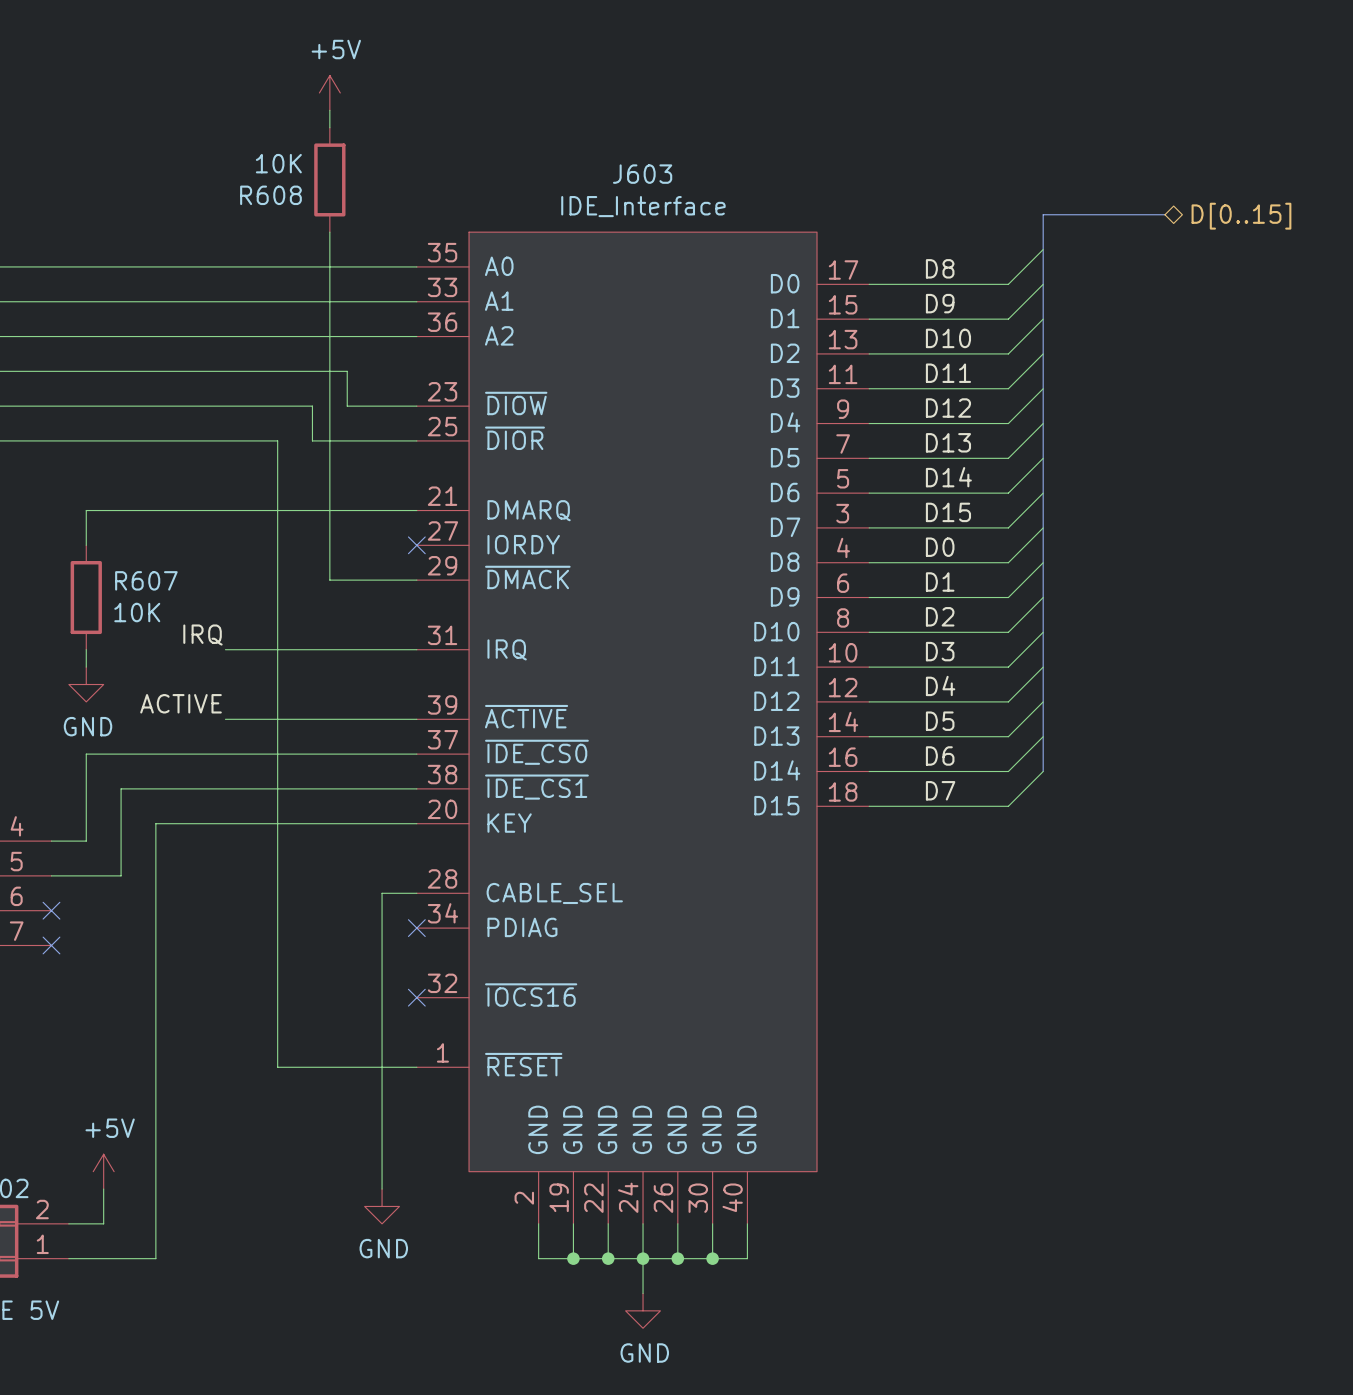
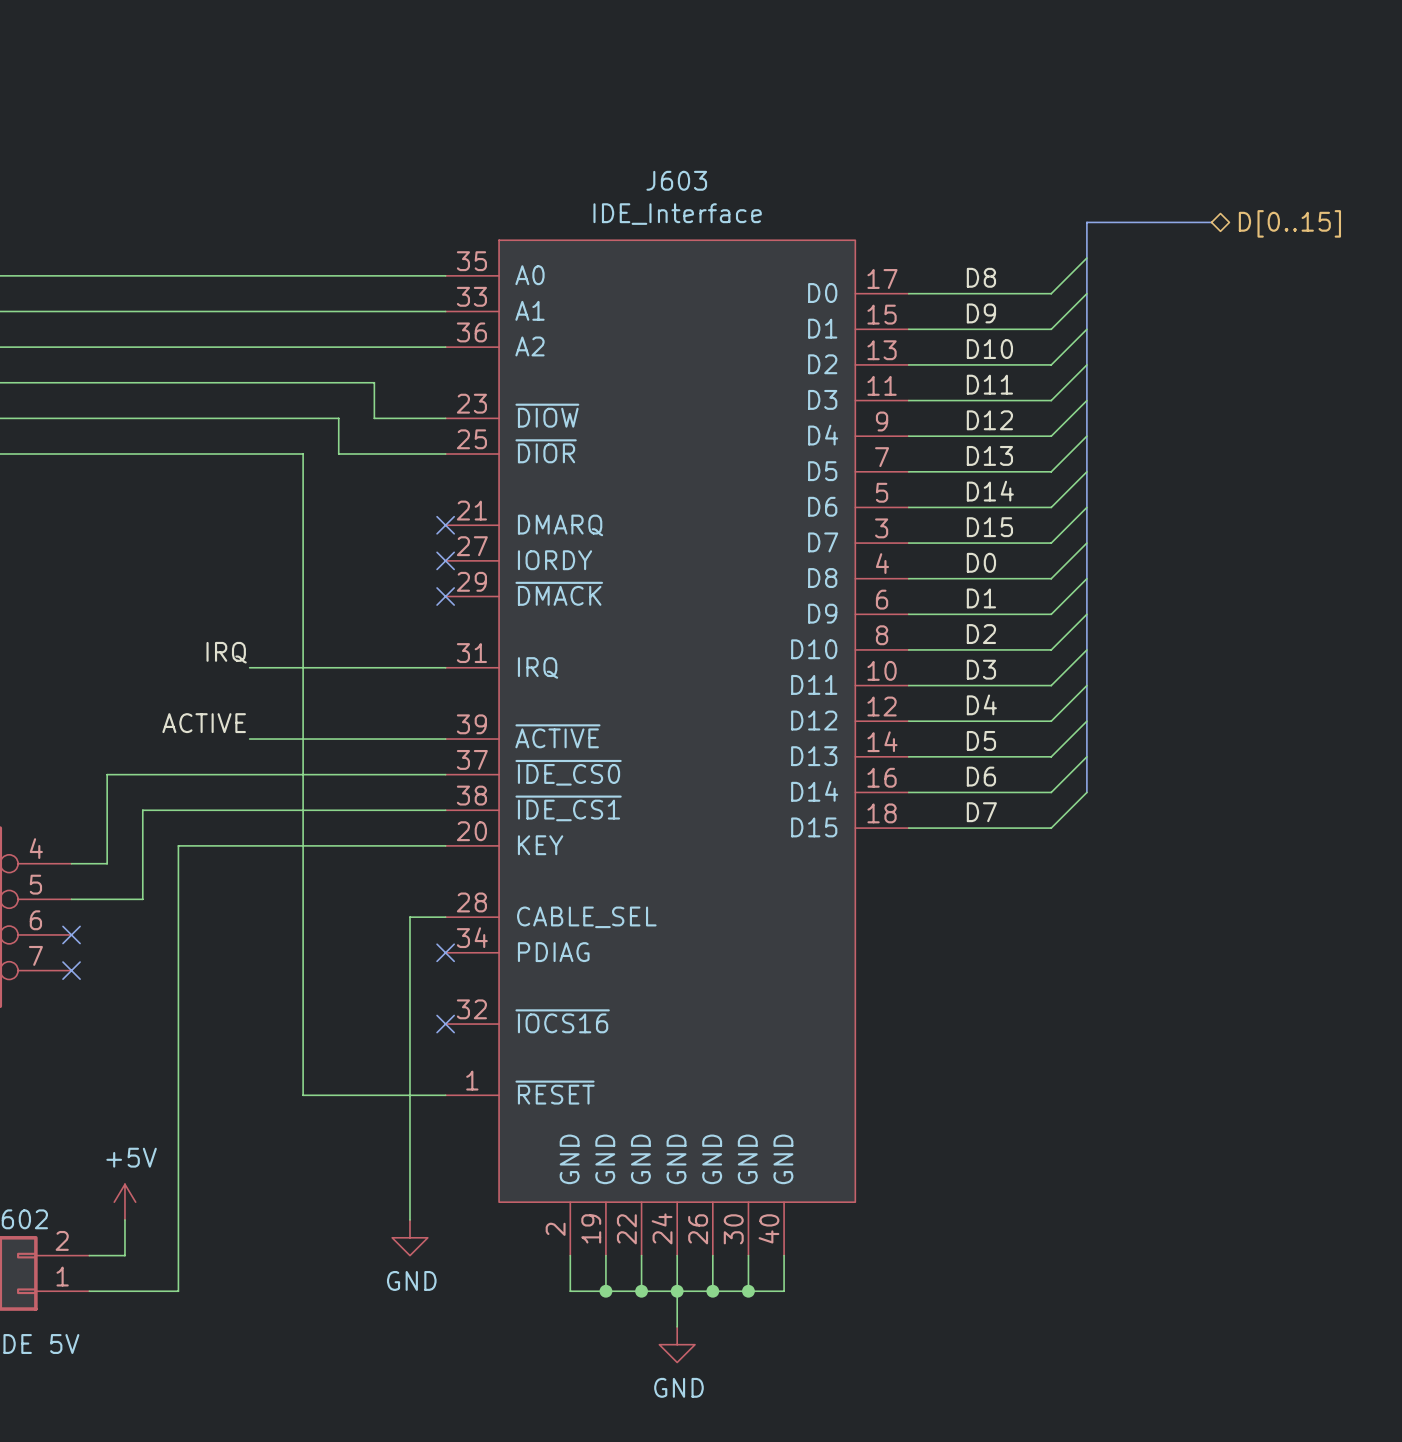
power symbol: +5V (329, 92) -> none
wire: (329, 110) (329, 127) -> none
R608: 10K (329, 179) -> none
wire: (329, 232) (329, 580) (416, 580) -> none
wire: (416, 510) (86, 510) (86, 545) -> none
no-connect mark: none -> (445, 525)
no-connect mark: none -> (445, 596)
R607: 10K (86, 597) -> none
wire: (86, 649) (86, 667) -> none
power symbol: GND (86, 684) -> none

